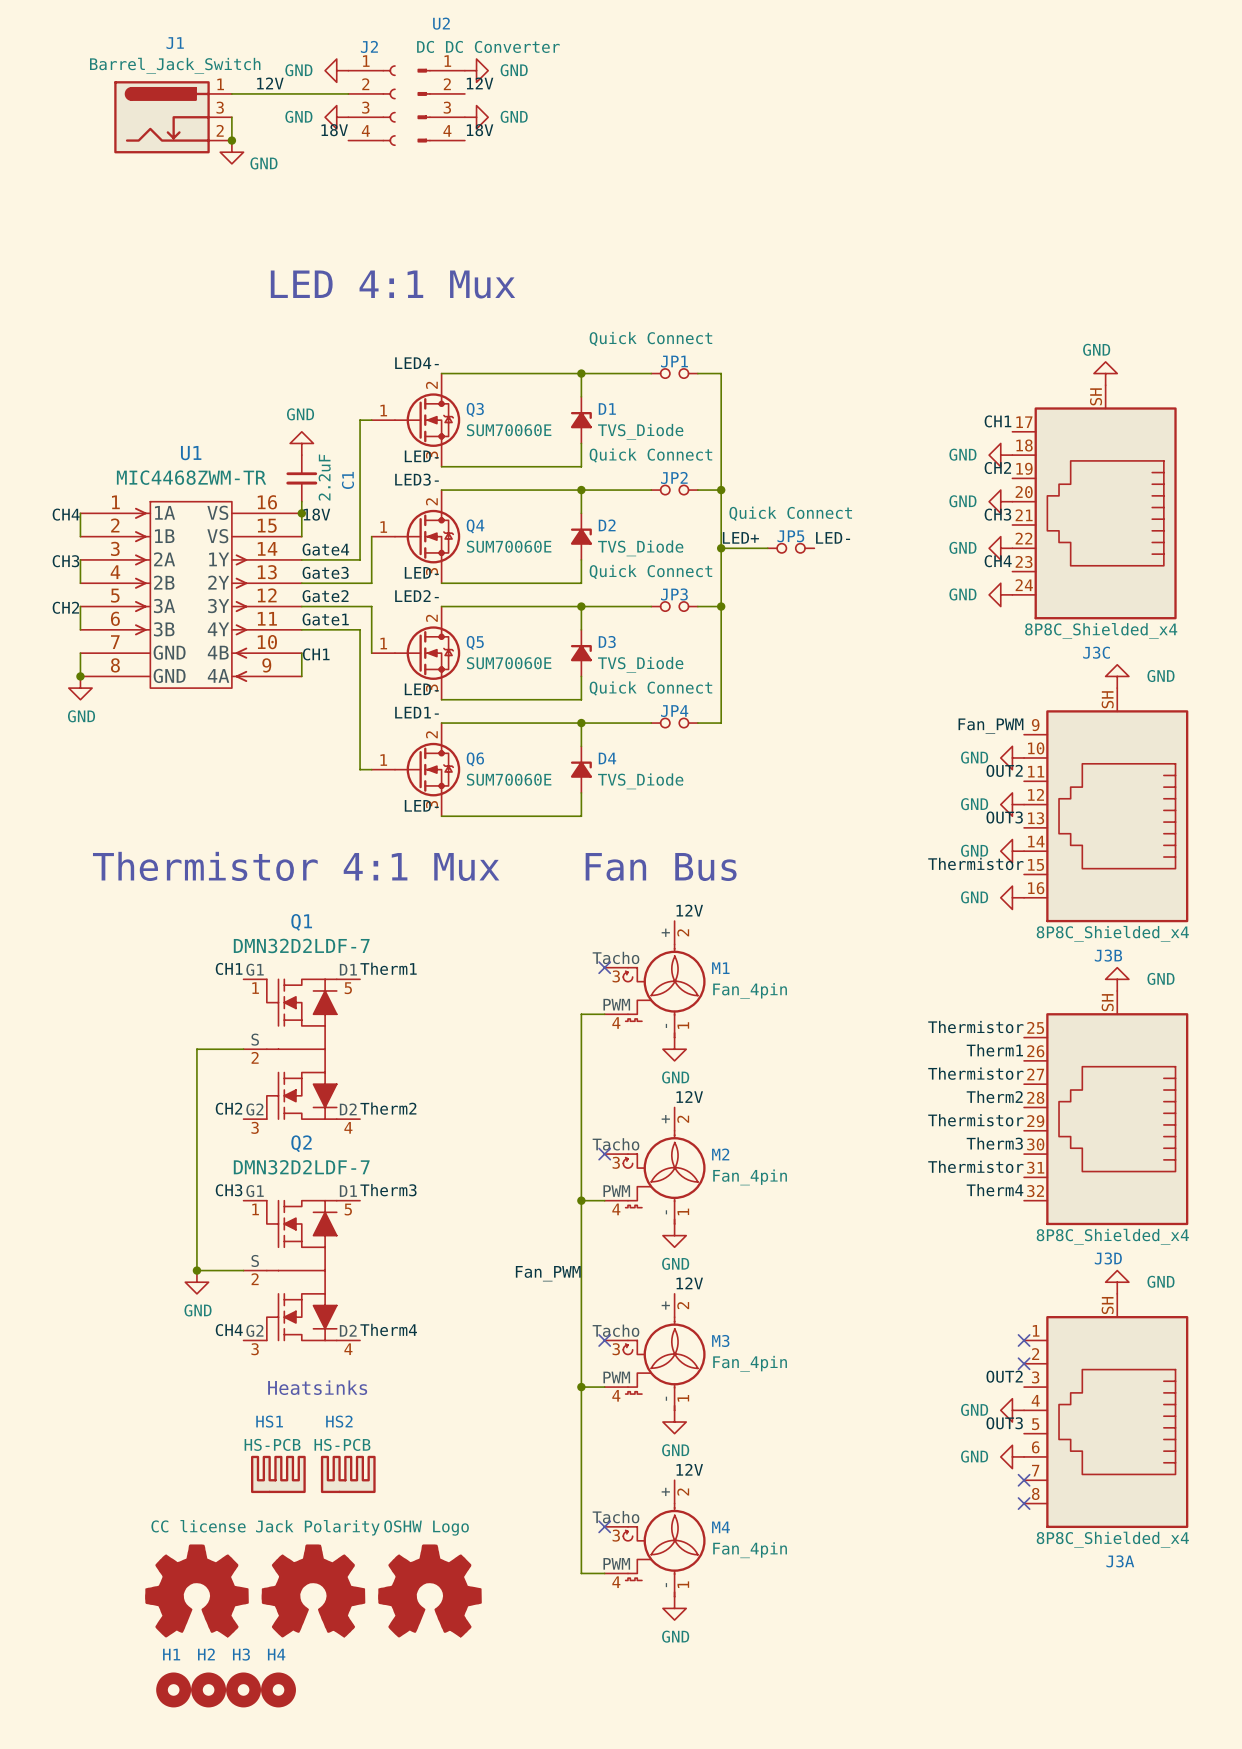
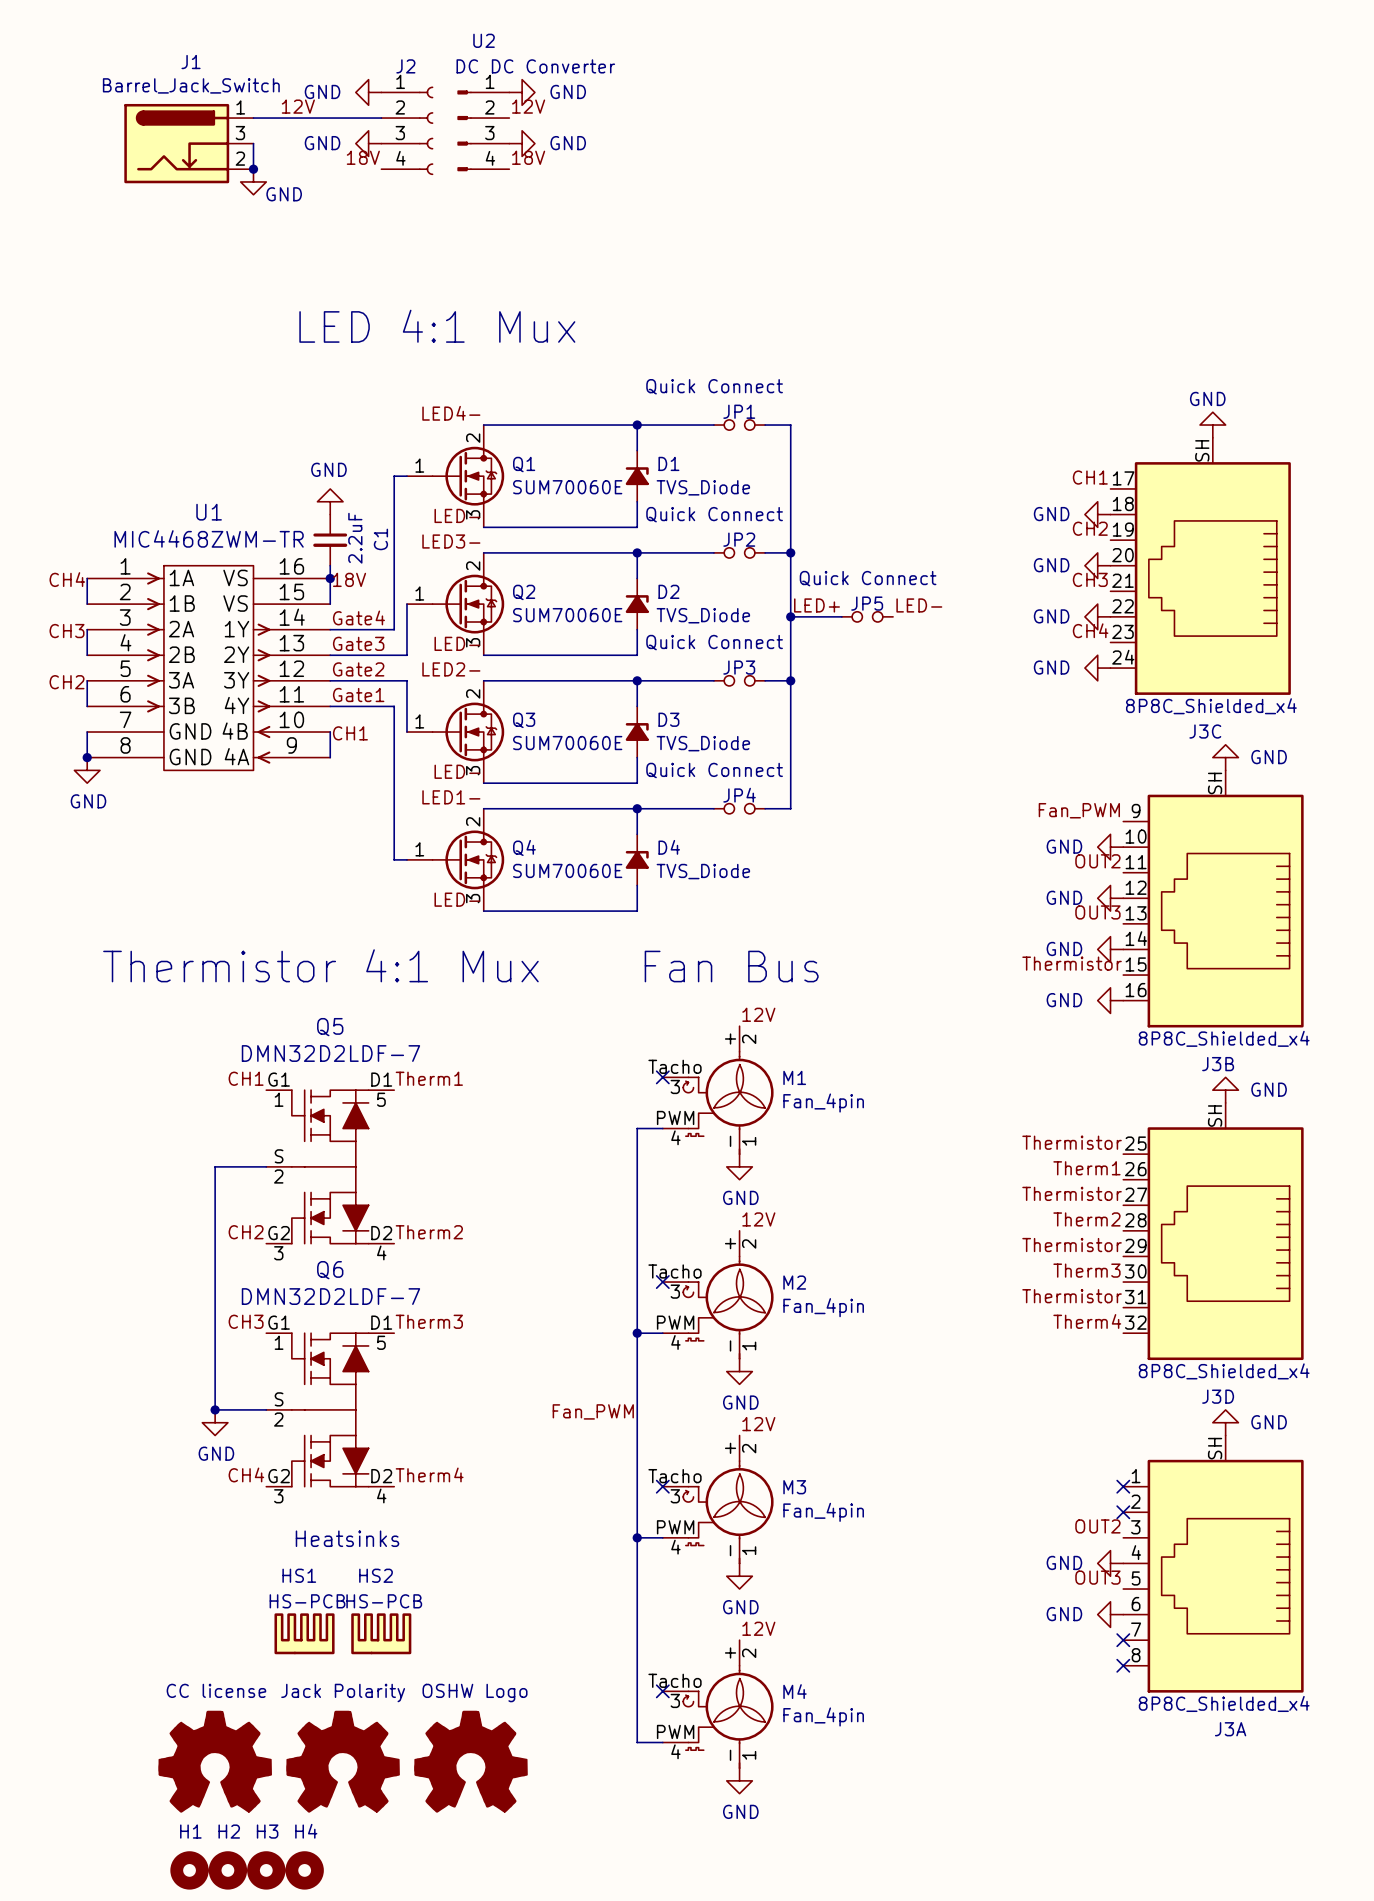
Q3 name: Q3 (475, 409) -> Q1 (524, 464)
Q4 name: Q4 (475, 526) -> Q2 (524, 592)
Q5 name: Q5 (475, 642) -> Q3 (524, 720)
Q6 name: Q6 (475, 759) -> Q4 (524, 847)
Q1 name: Q1 (301, 922) -> Q5 (330, 1027)
Q2 name: Q2 (301, 1143) -> Q6 (330, 1270)

